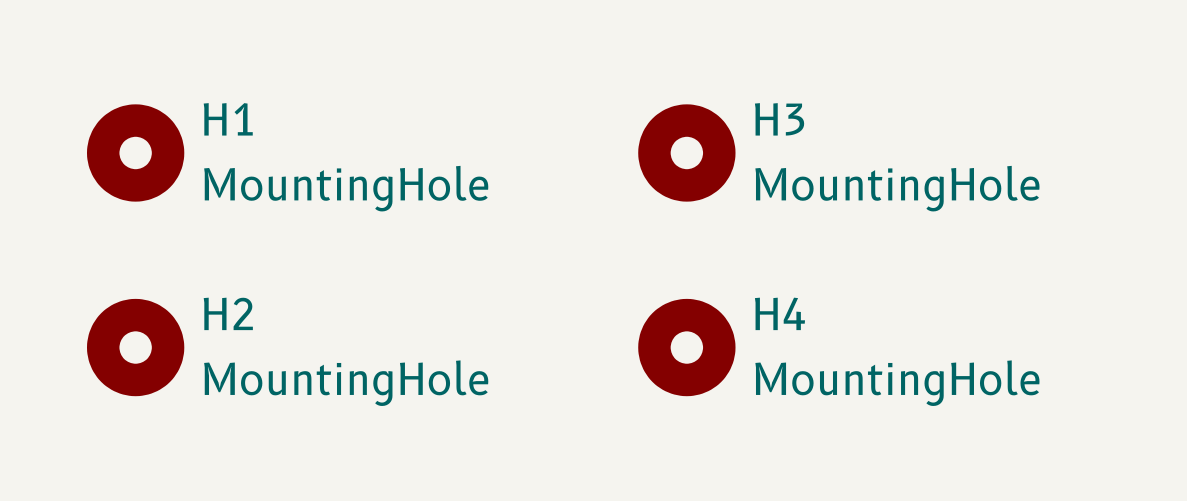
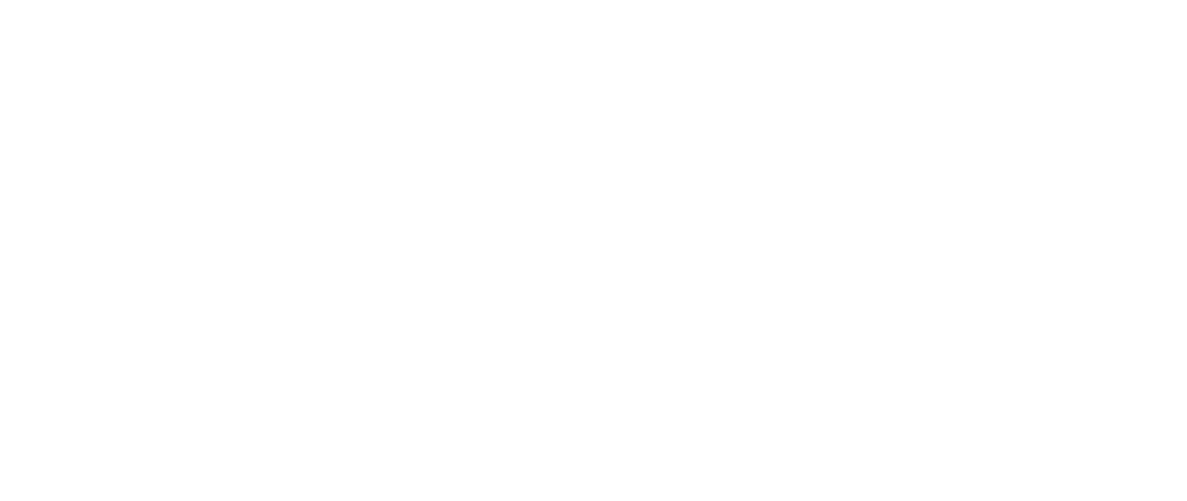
H1: MountingHole (135, 152) -> none
H3: MountingHole (686, 152) -> none
H2: MountingHole (135, 347) -> none
H4: MountingHole (686, 347) -> none

